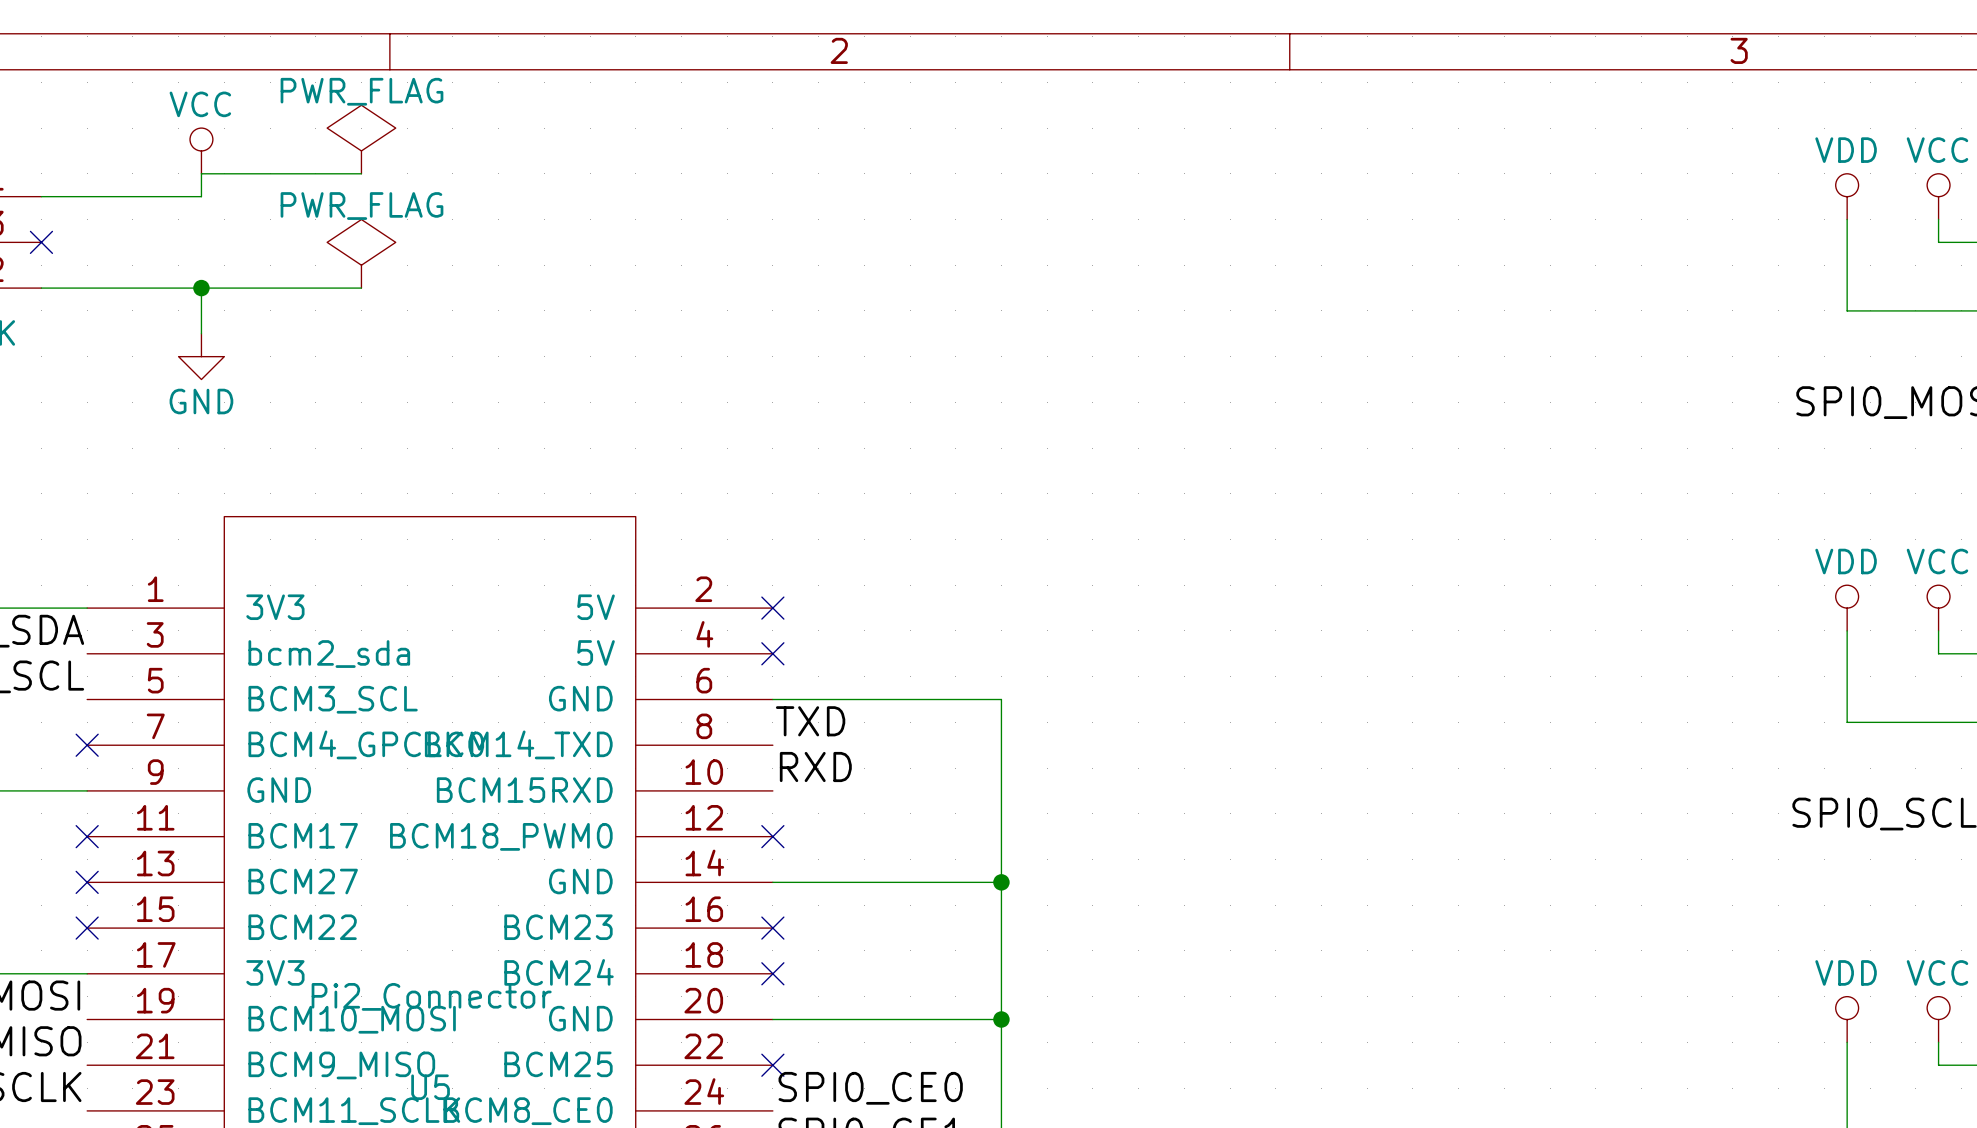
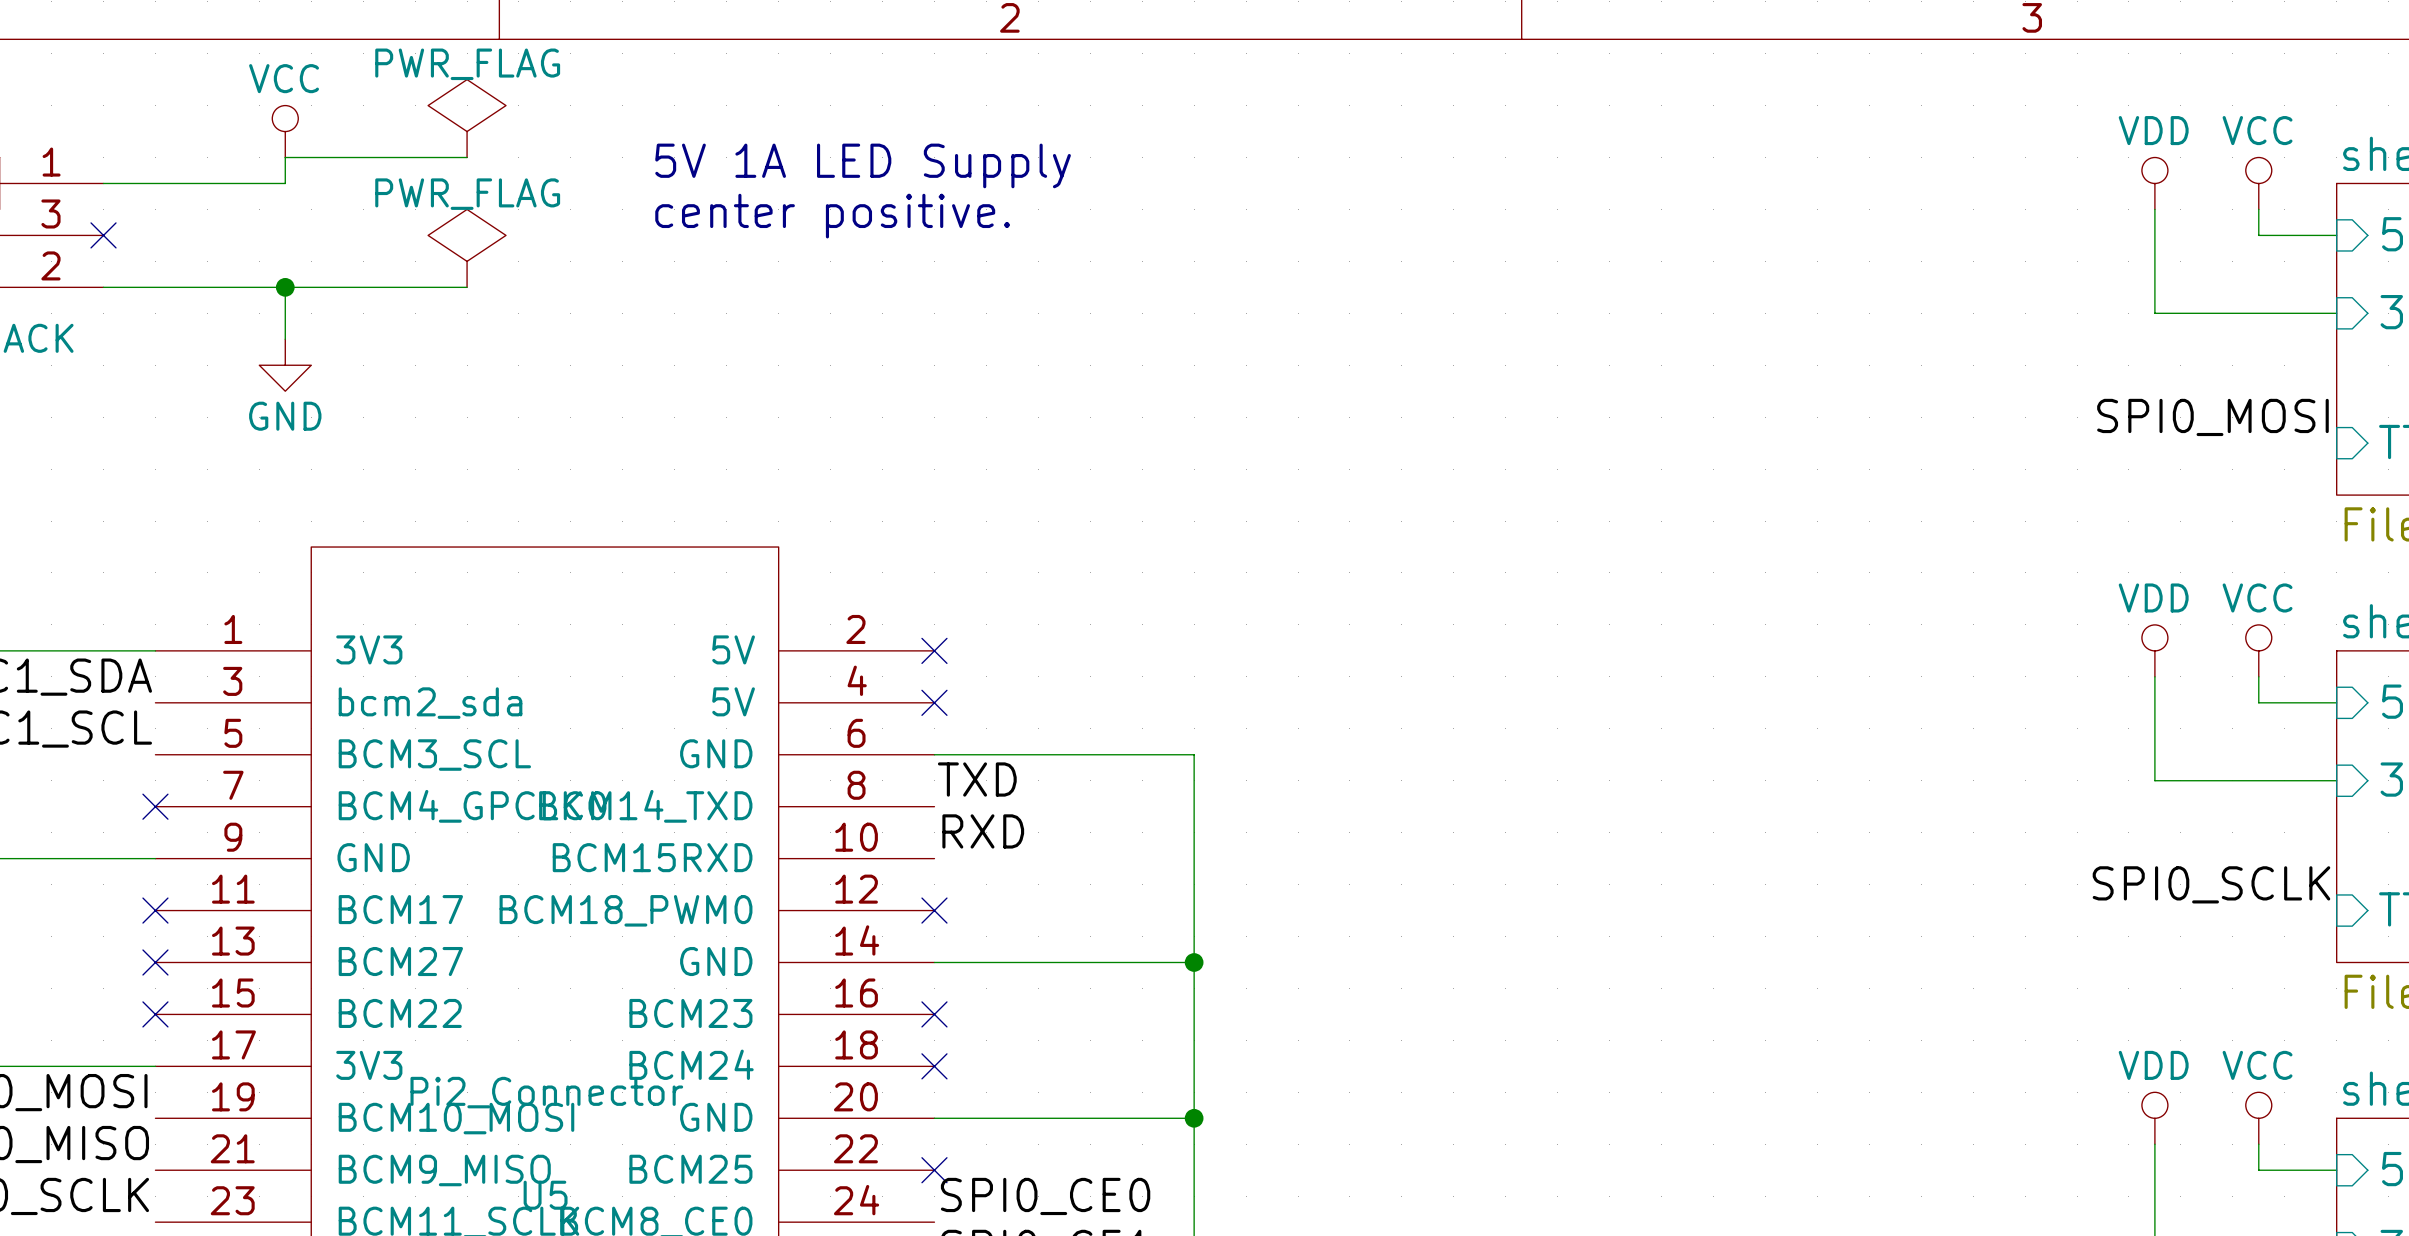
text: none -> 5V 1A LED Supply (863, 165)
text: none -> center positive. (832, 216)

